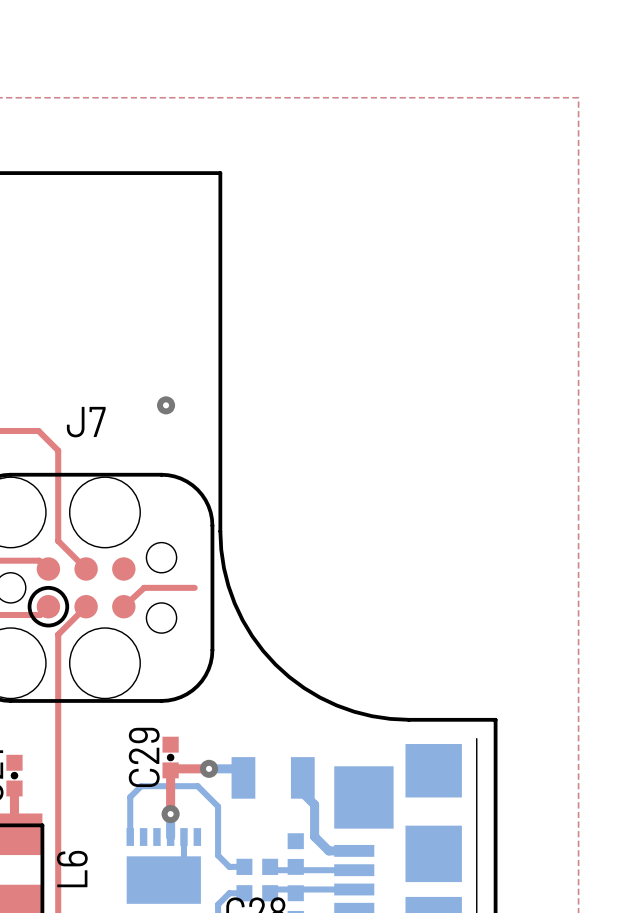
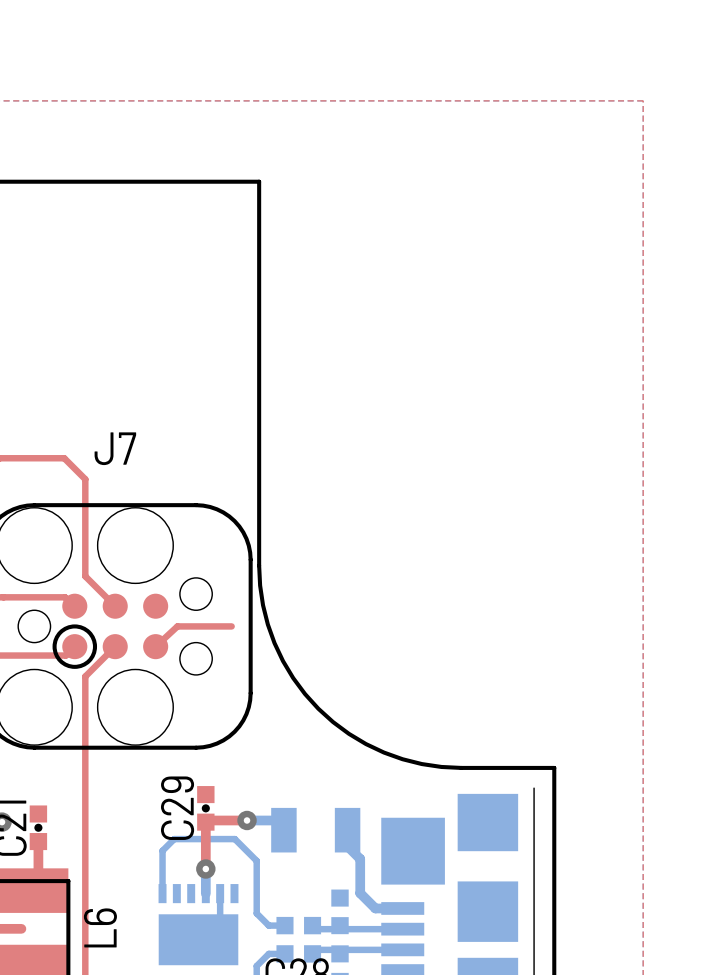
via: (166, 405) -> none

